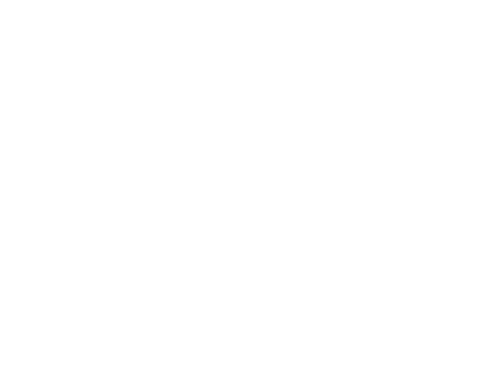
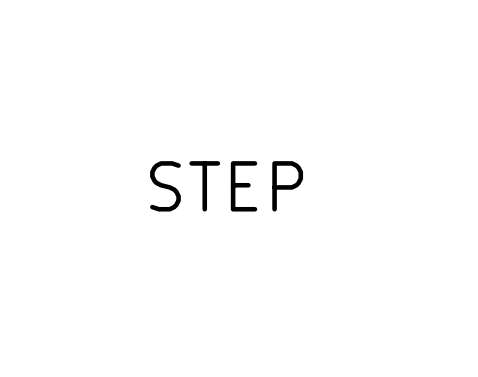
label: none -> STEP (226, 186)

